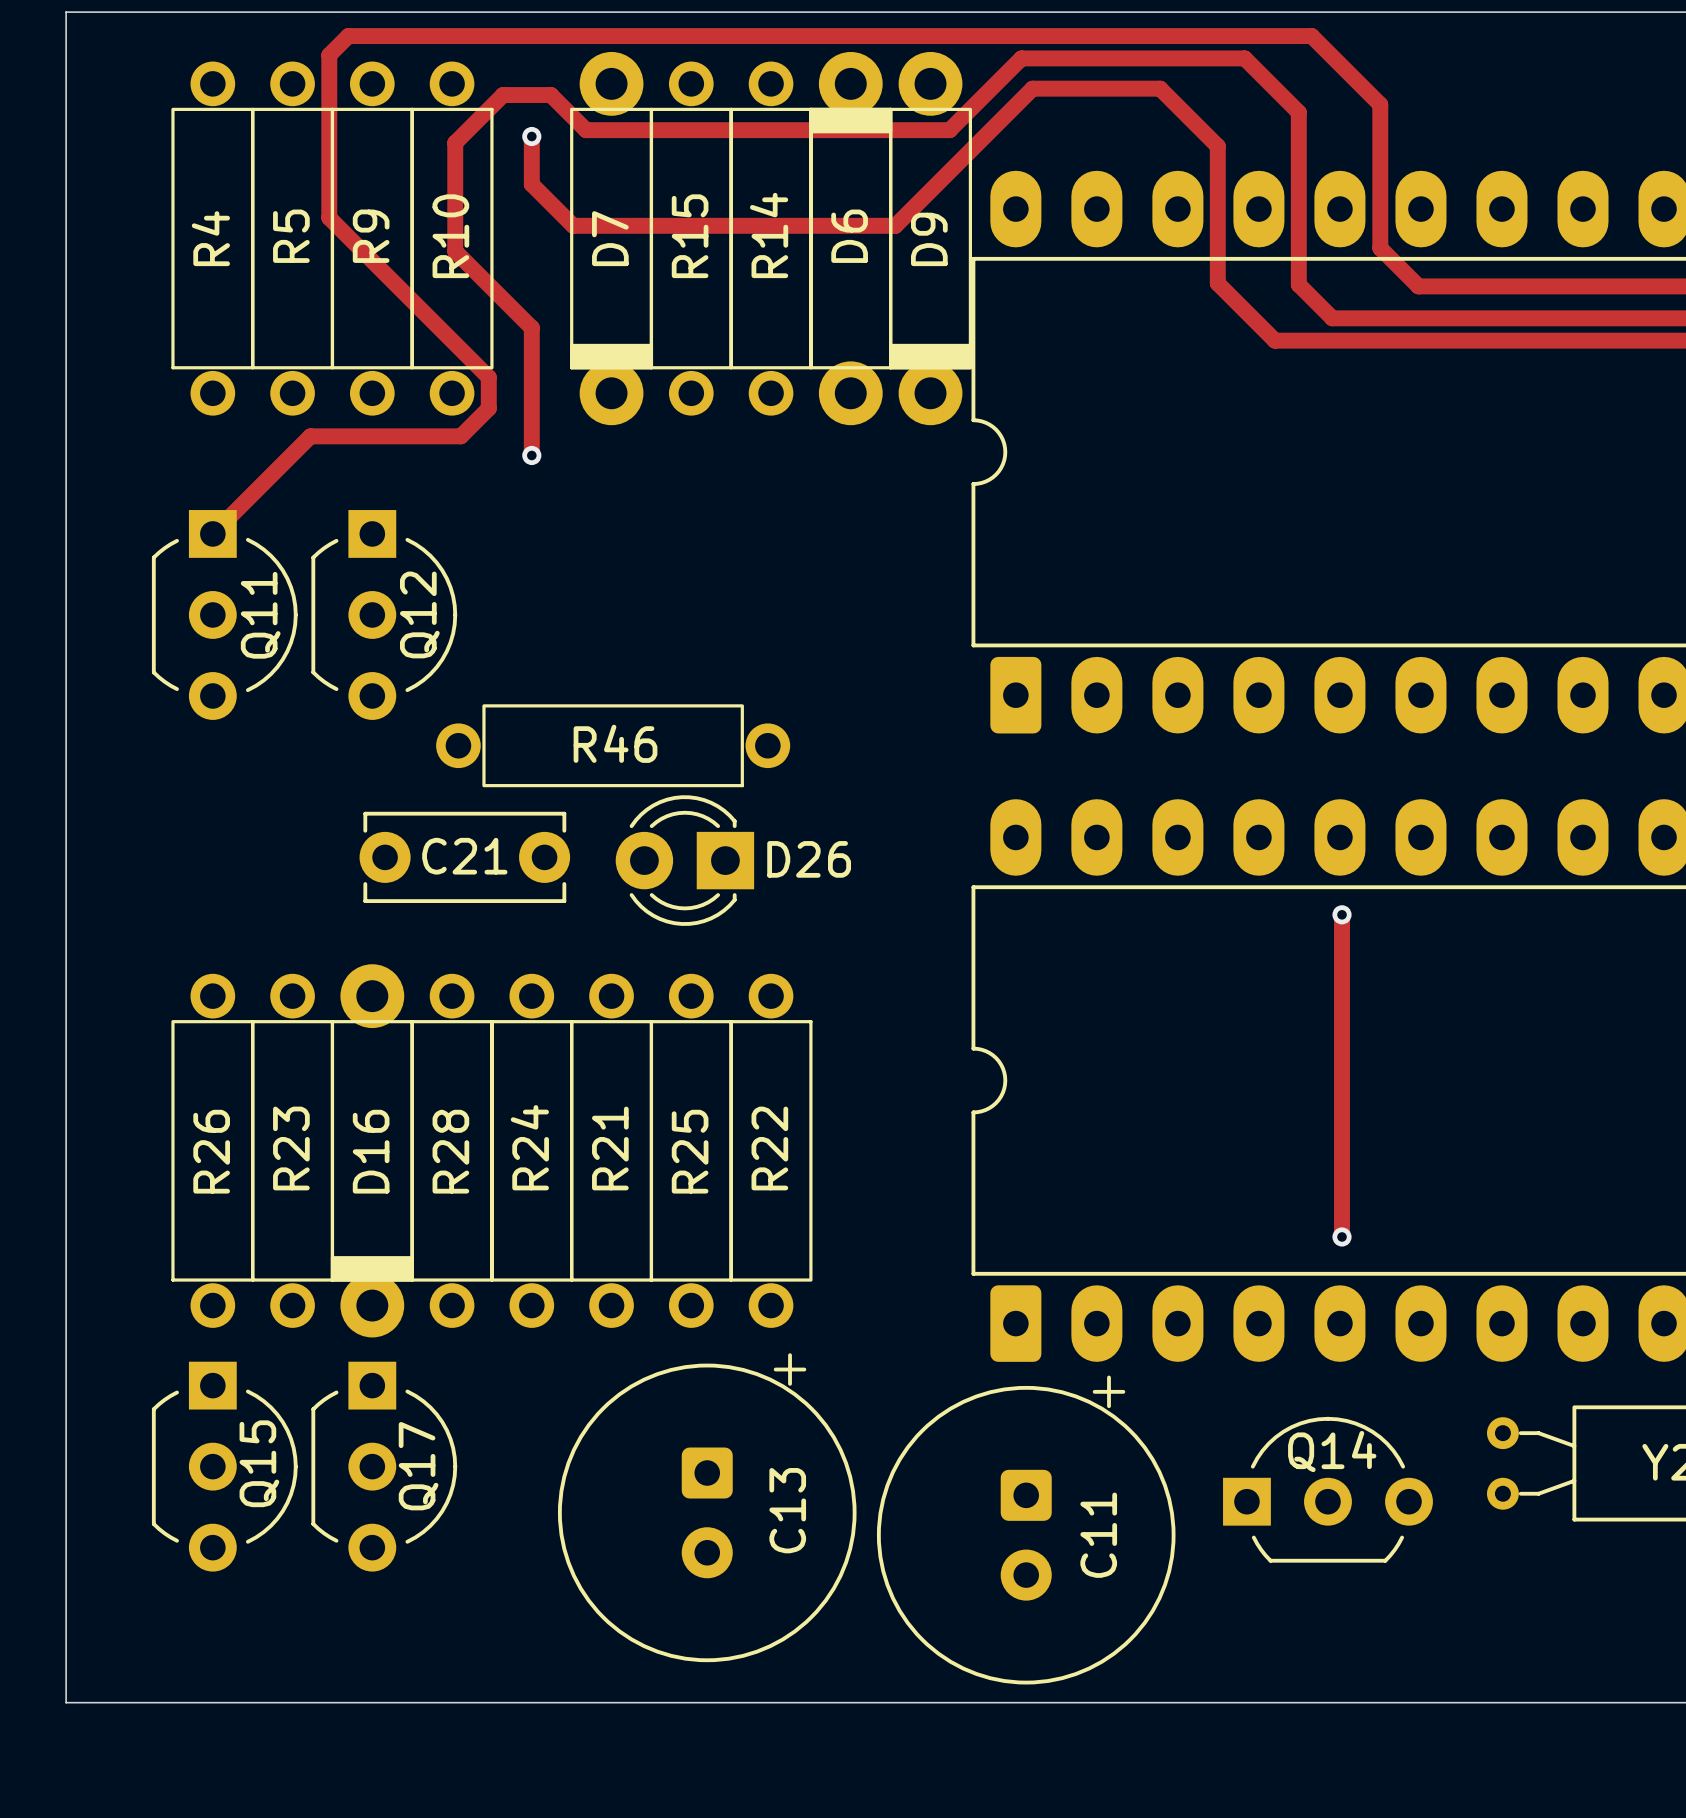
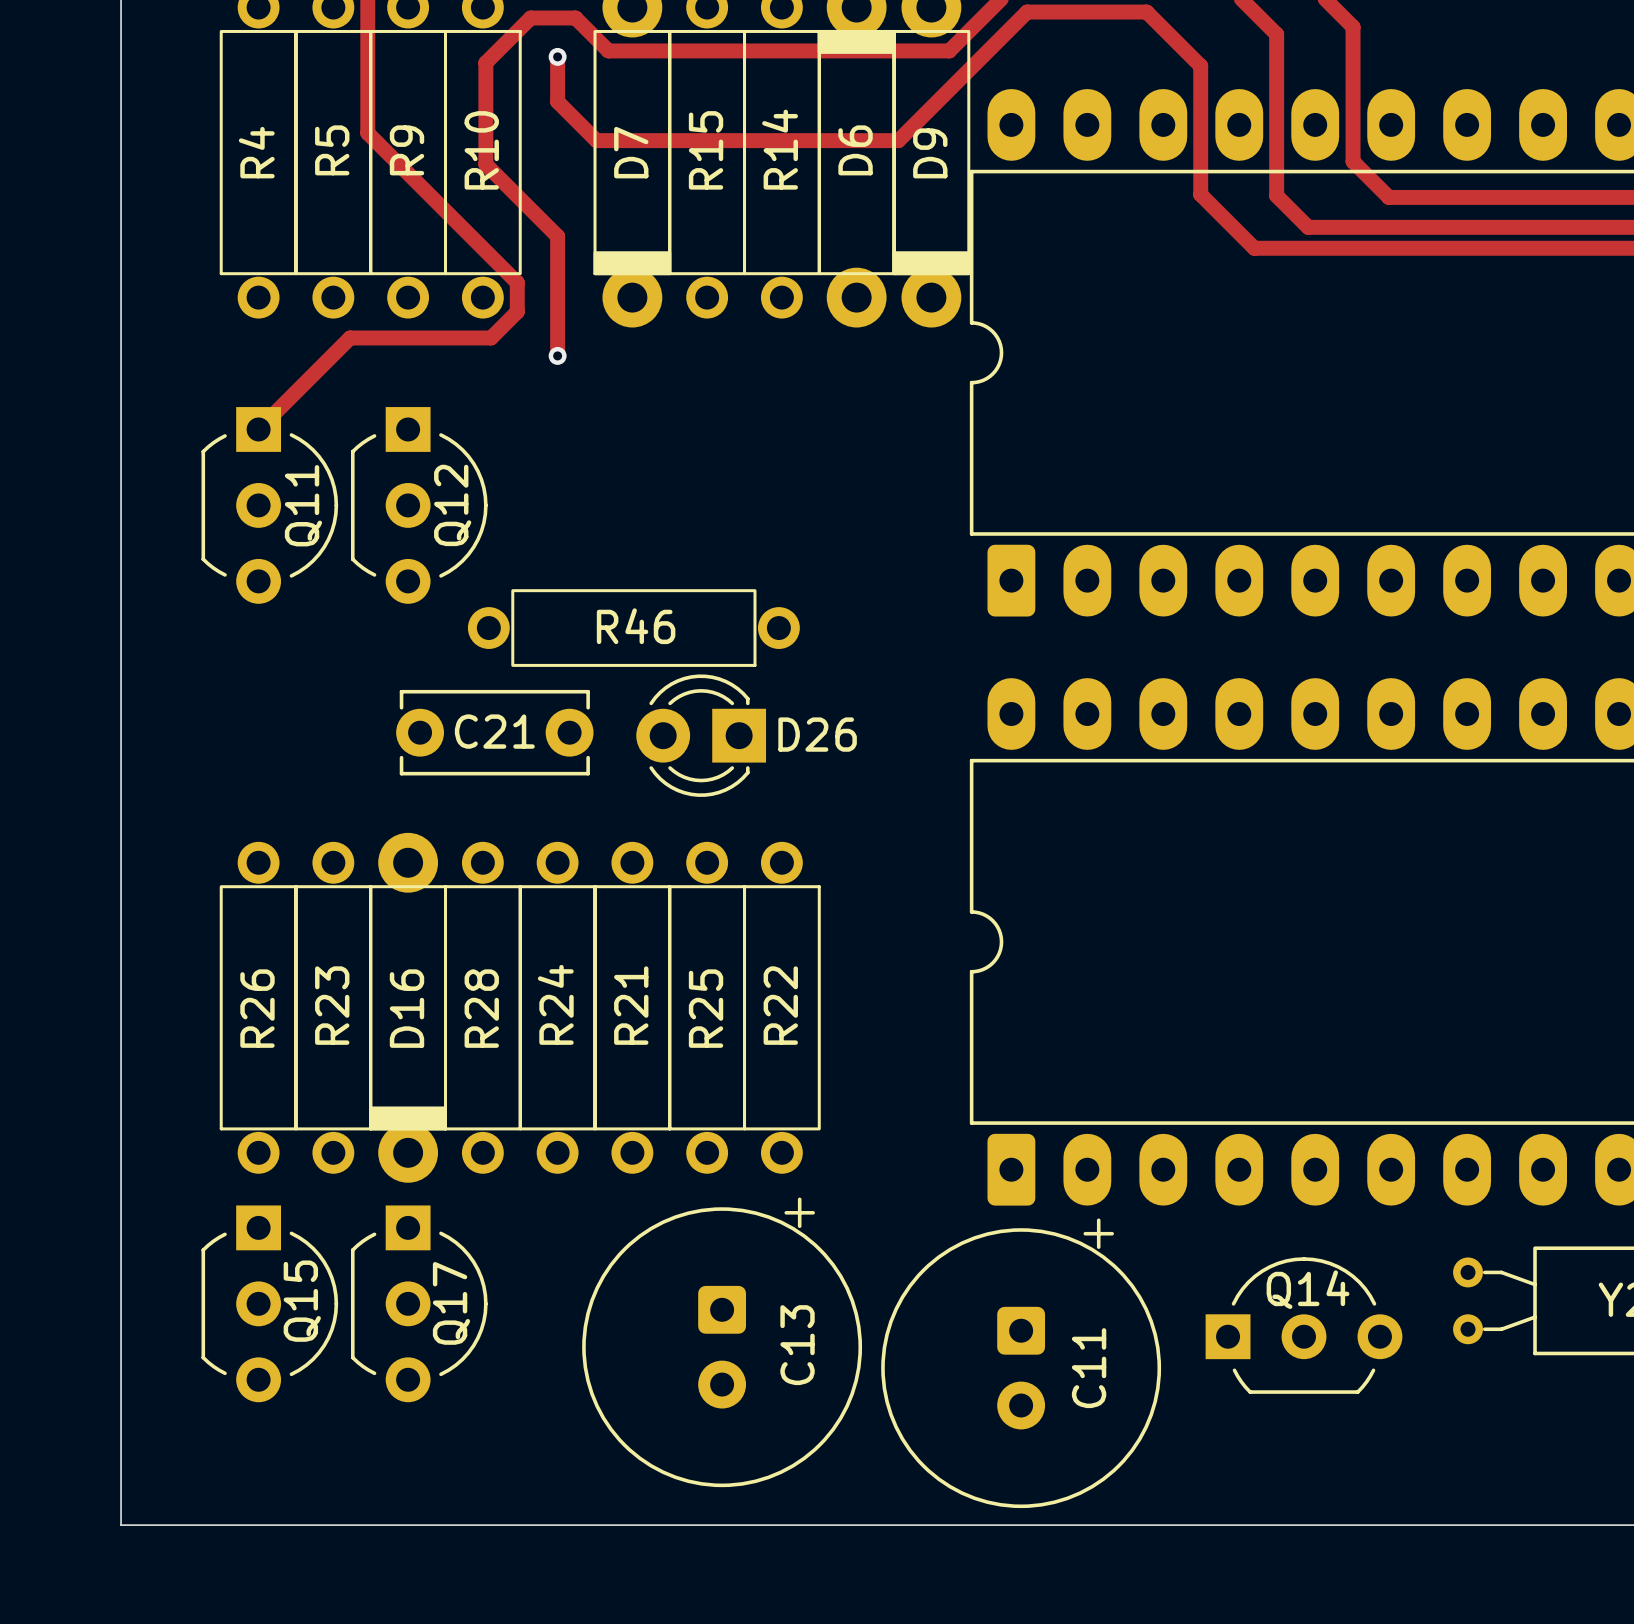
track: (1342, 914) (1342, 1236) -> none
via: (1342, 914) -> none
via: (1342, 1236) -> none

